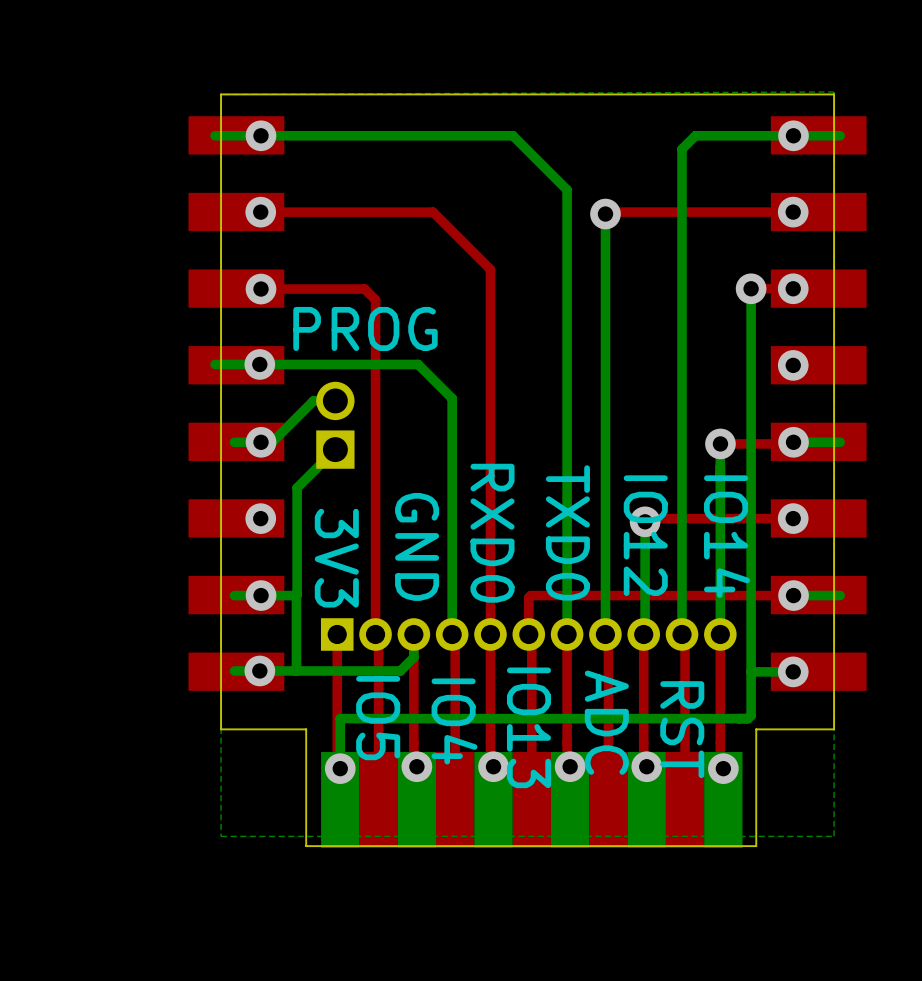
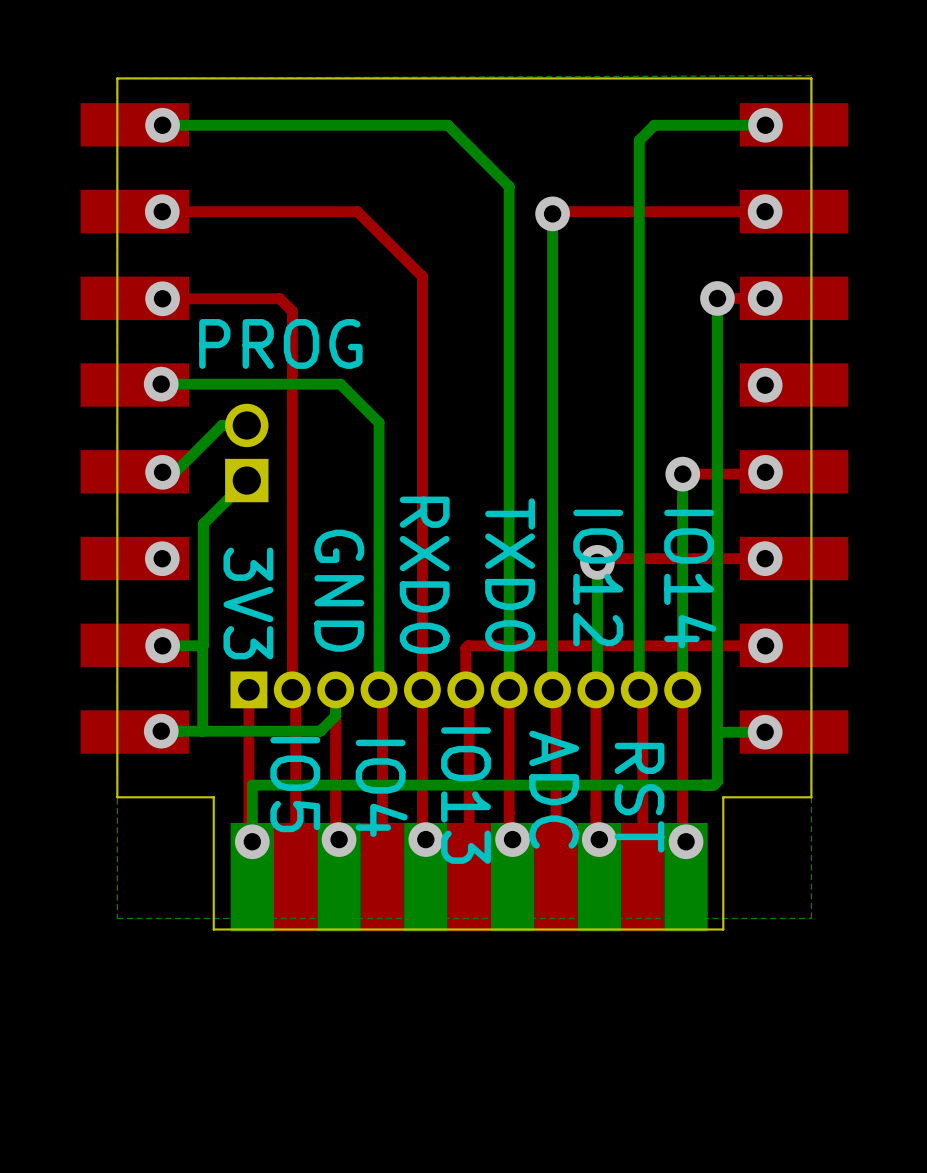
bottom track: (260, 135) (214, 135) -> none
bottom track: (840, 135) (793, 135) -> none
bottom track: (259, 364) (214, 364) -> none
bottom track: (261, 442) (234, 442) -> none
bottom track: (840, 442) (793, 442) -> none
bottom track: (261, 595) (234, 595) -> none
bottom track: (840, 595) (793, 595) -> none
bottom track: (259, 670) (234, 670) -> none

